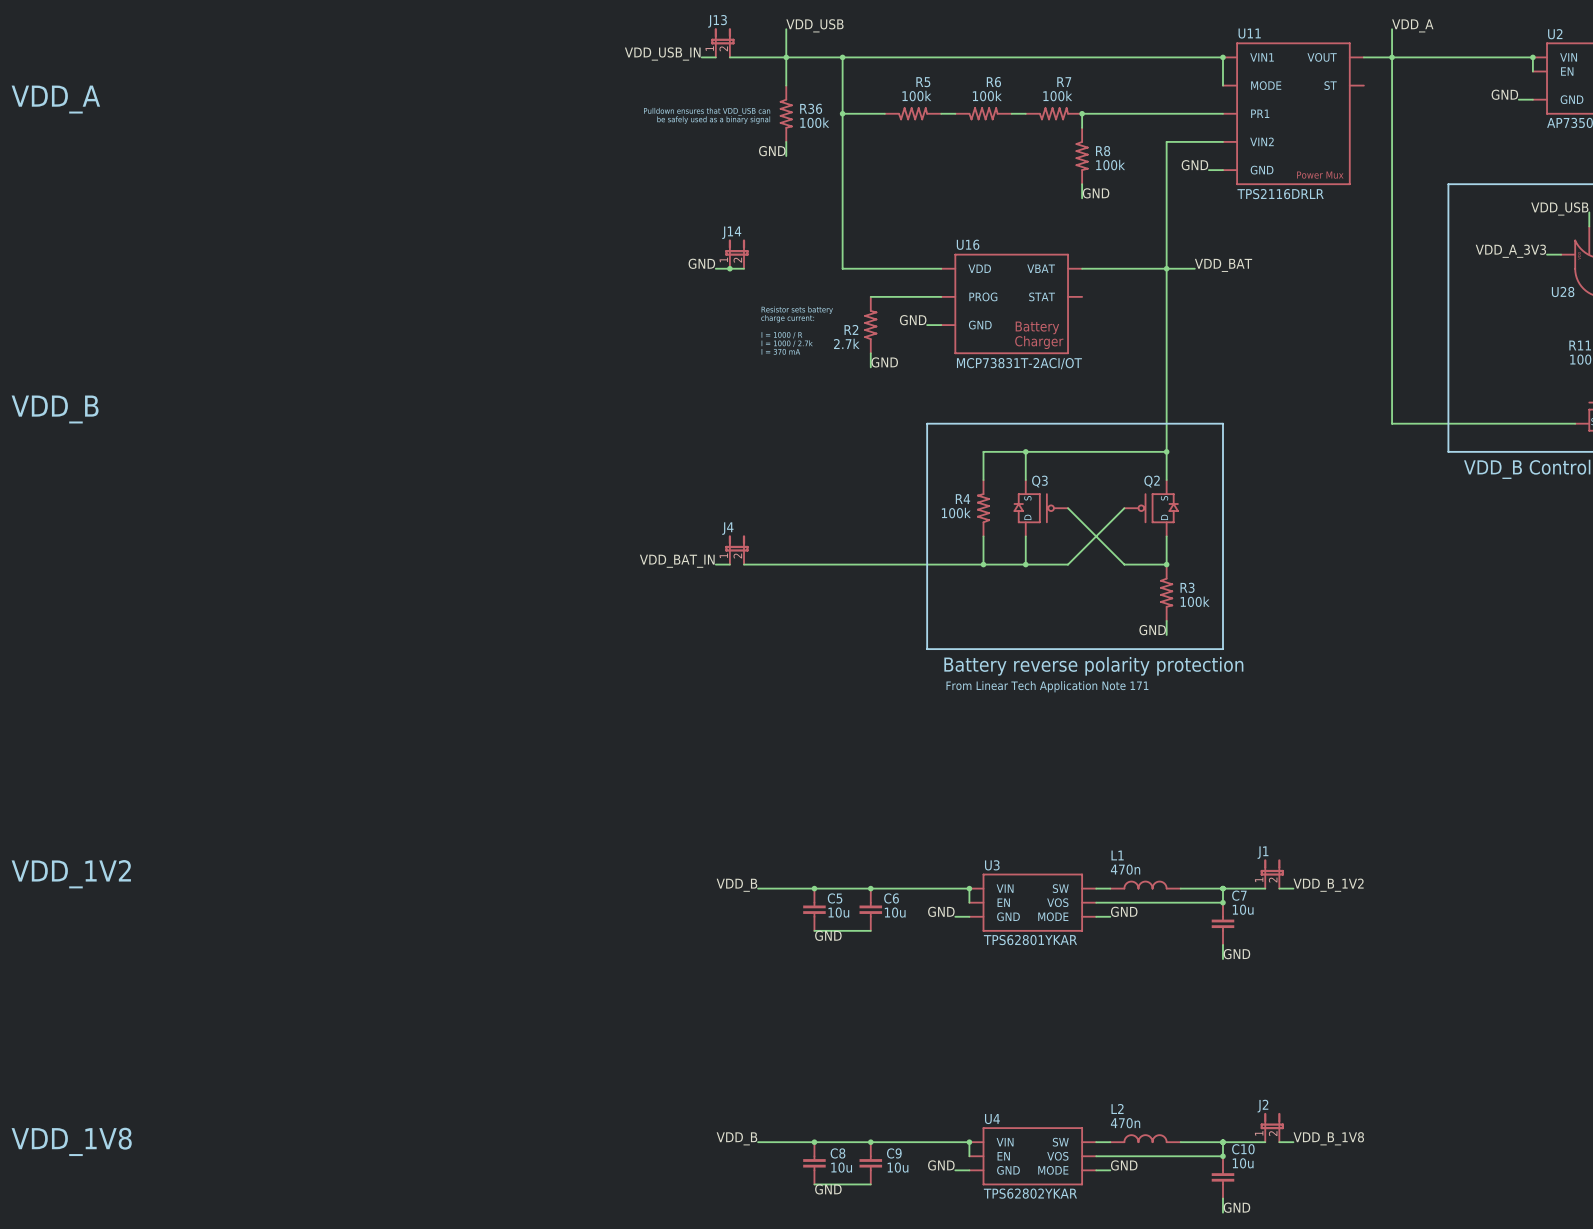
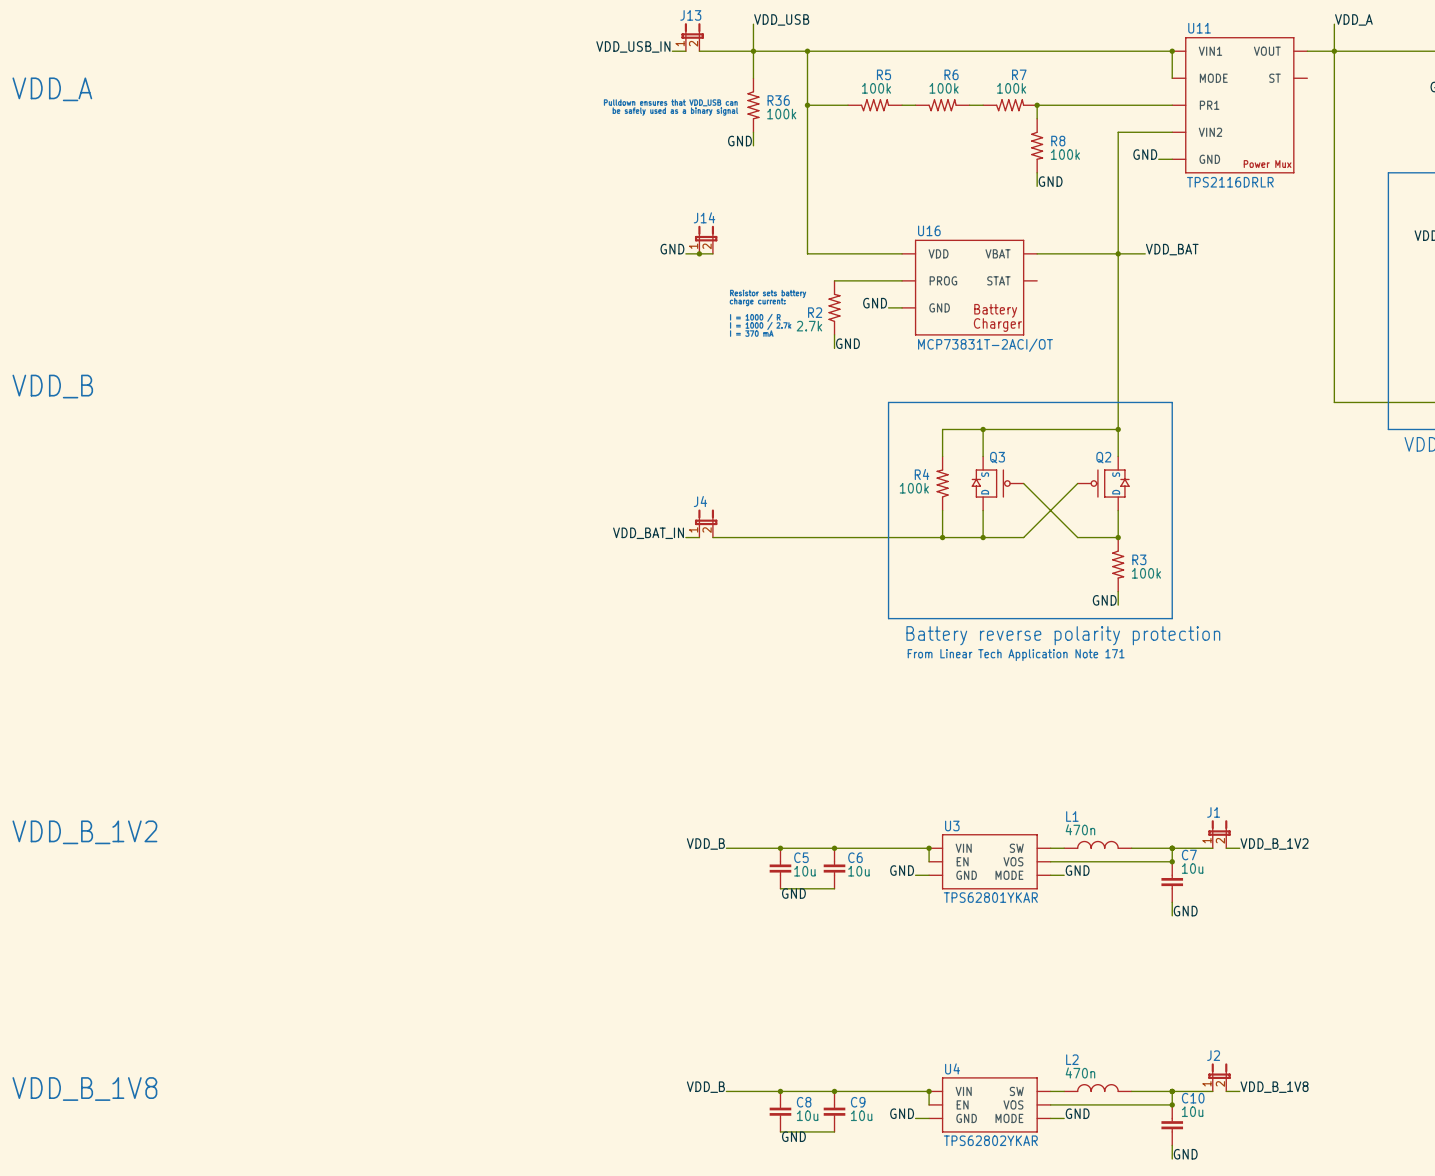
text: VDD_1V2 (71, 874) -> VDD_B_1V2 (84, 832)
text: VDD_1V8 (71, 1141) -> VDD_B_1V8 (84, 1089)

